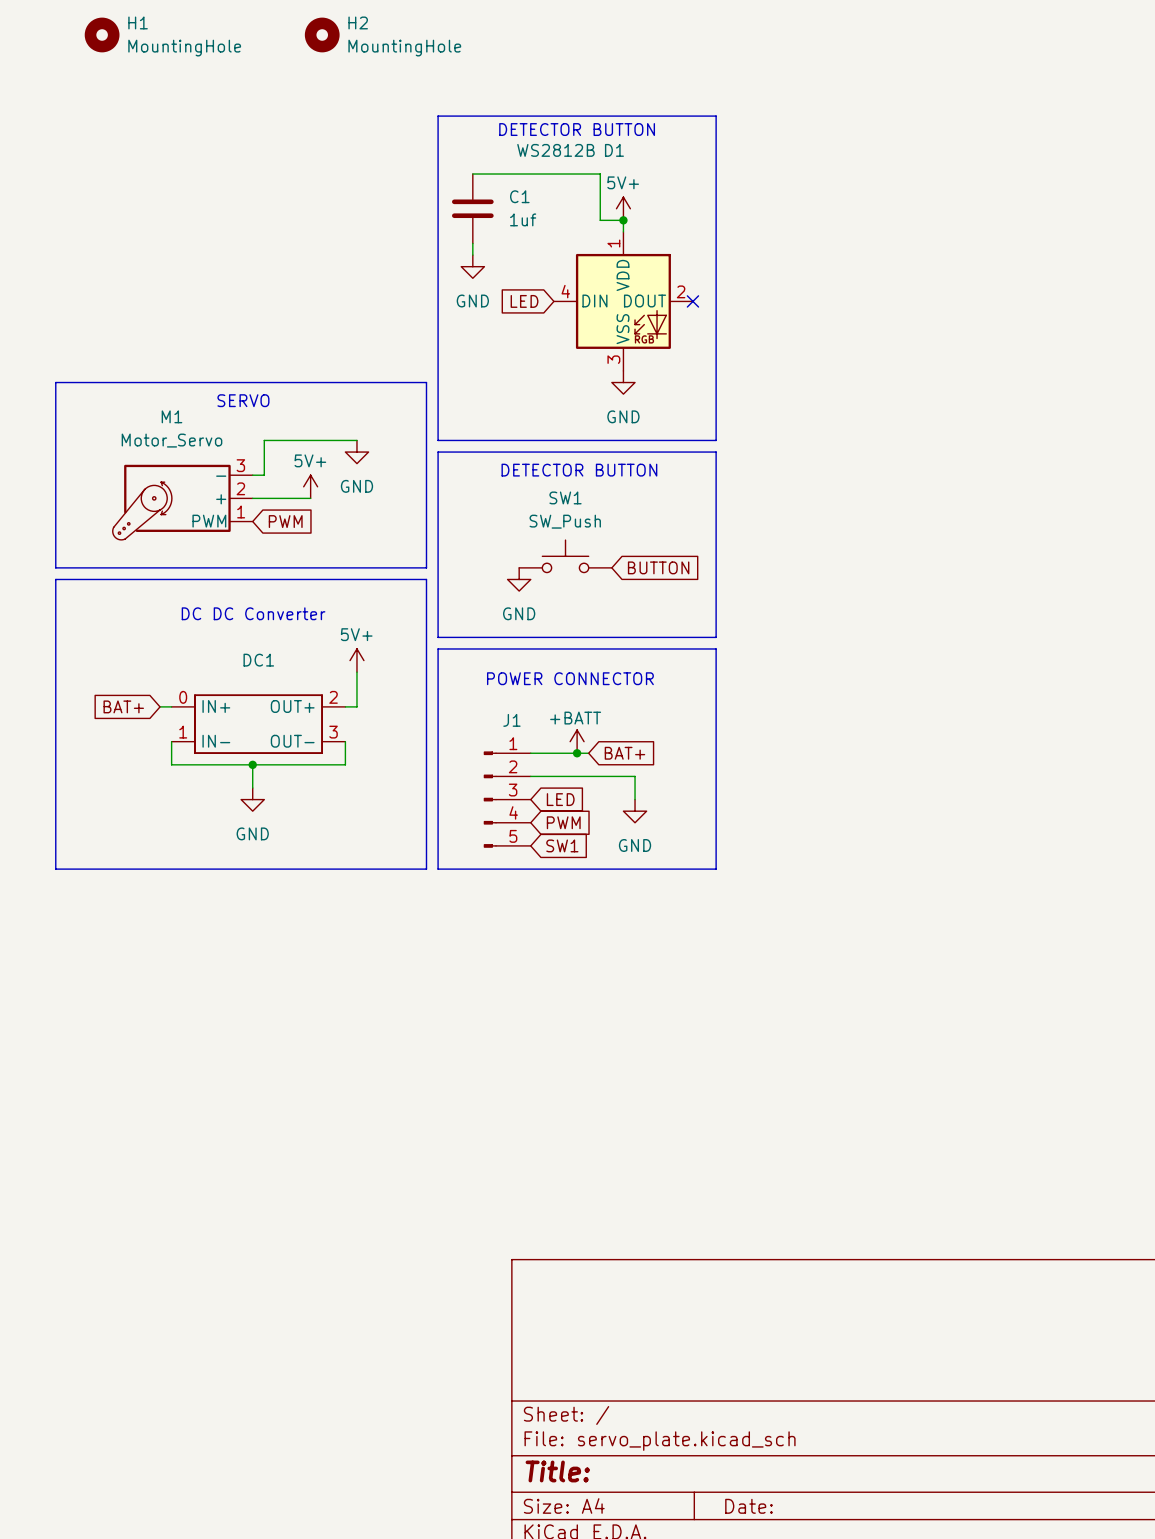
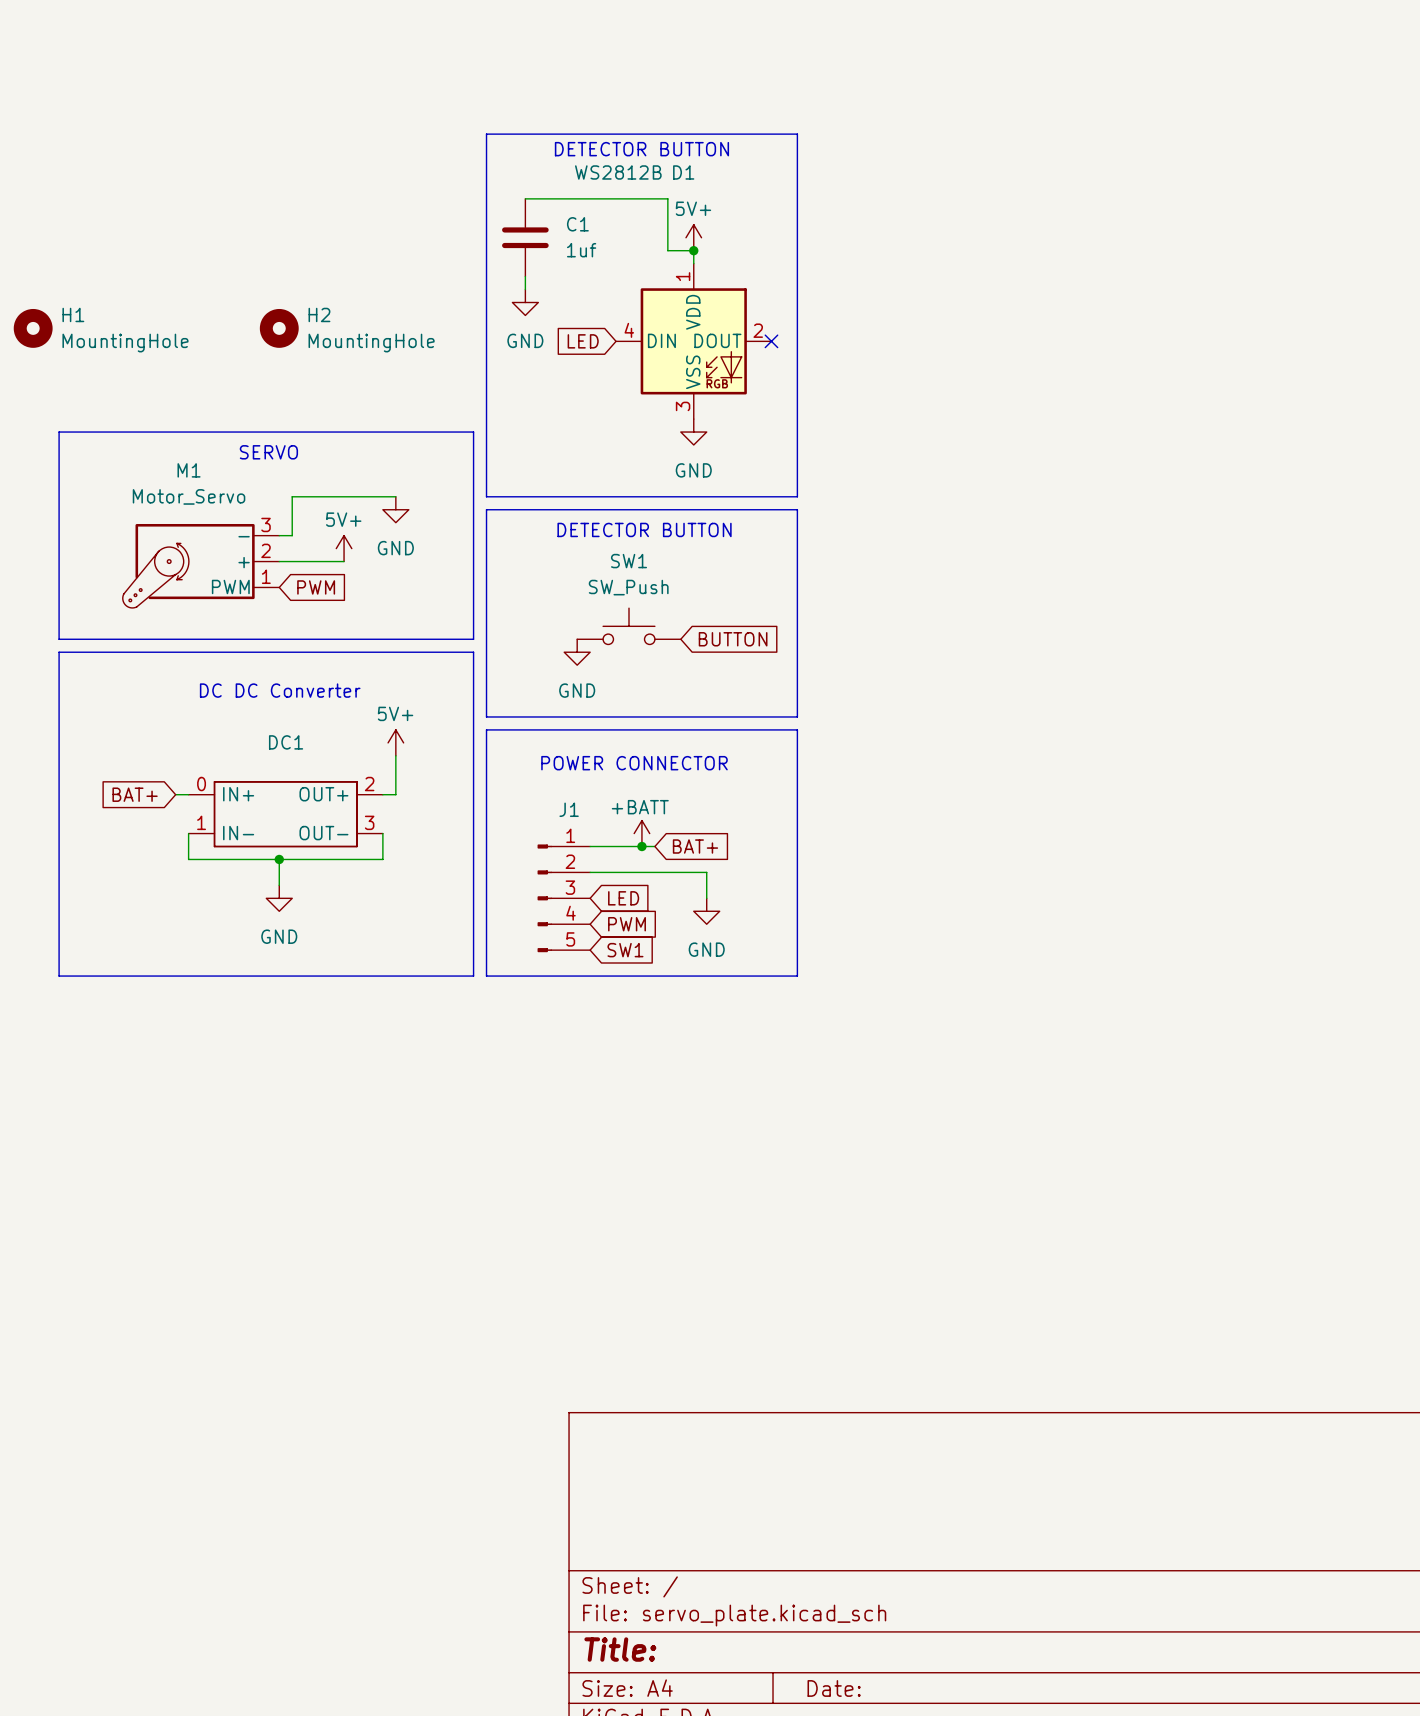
H1 position: (102, 34) -> (33, 328)
H2 position: (322, 34) -> (279, 328)

